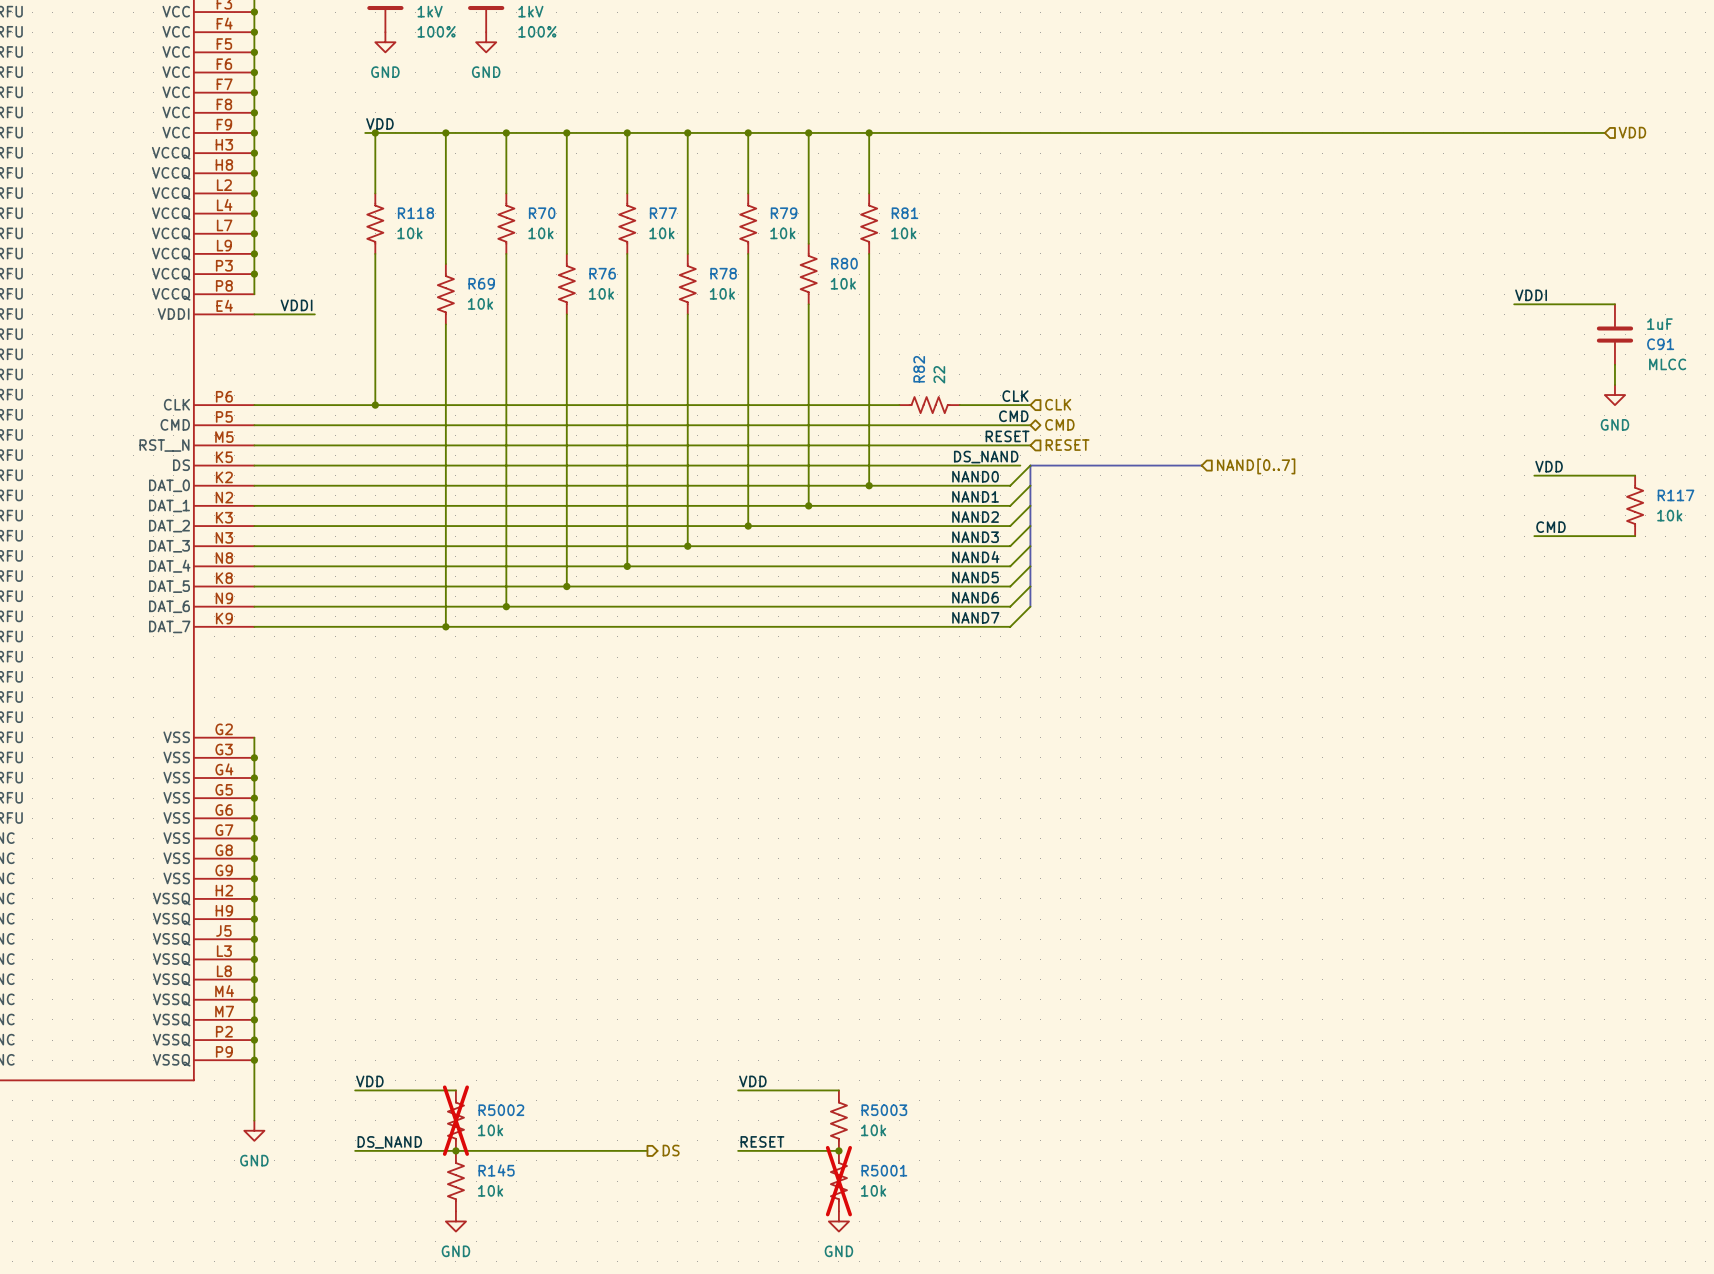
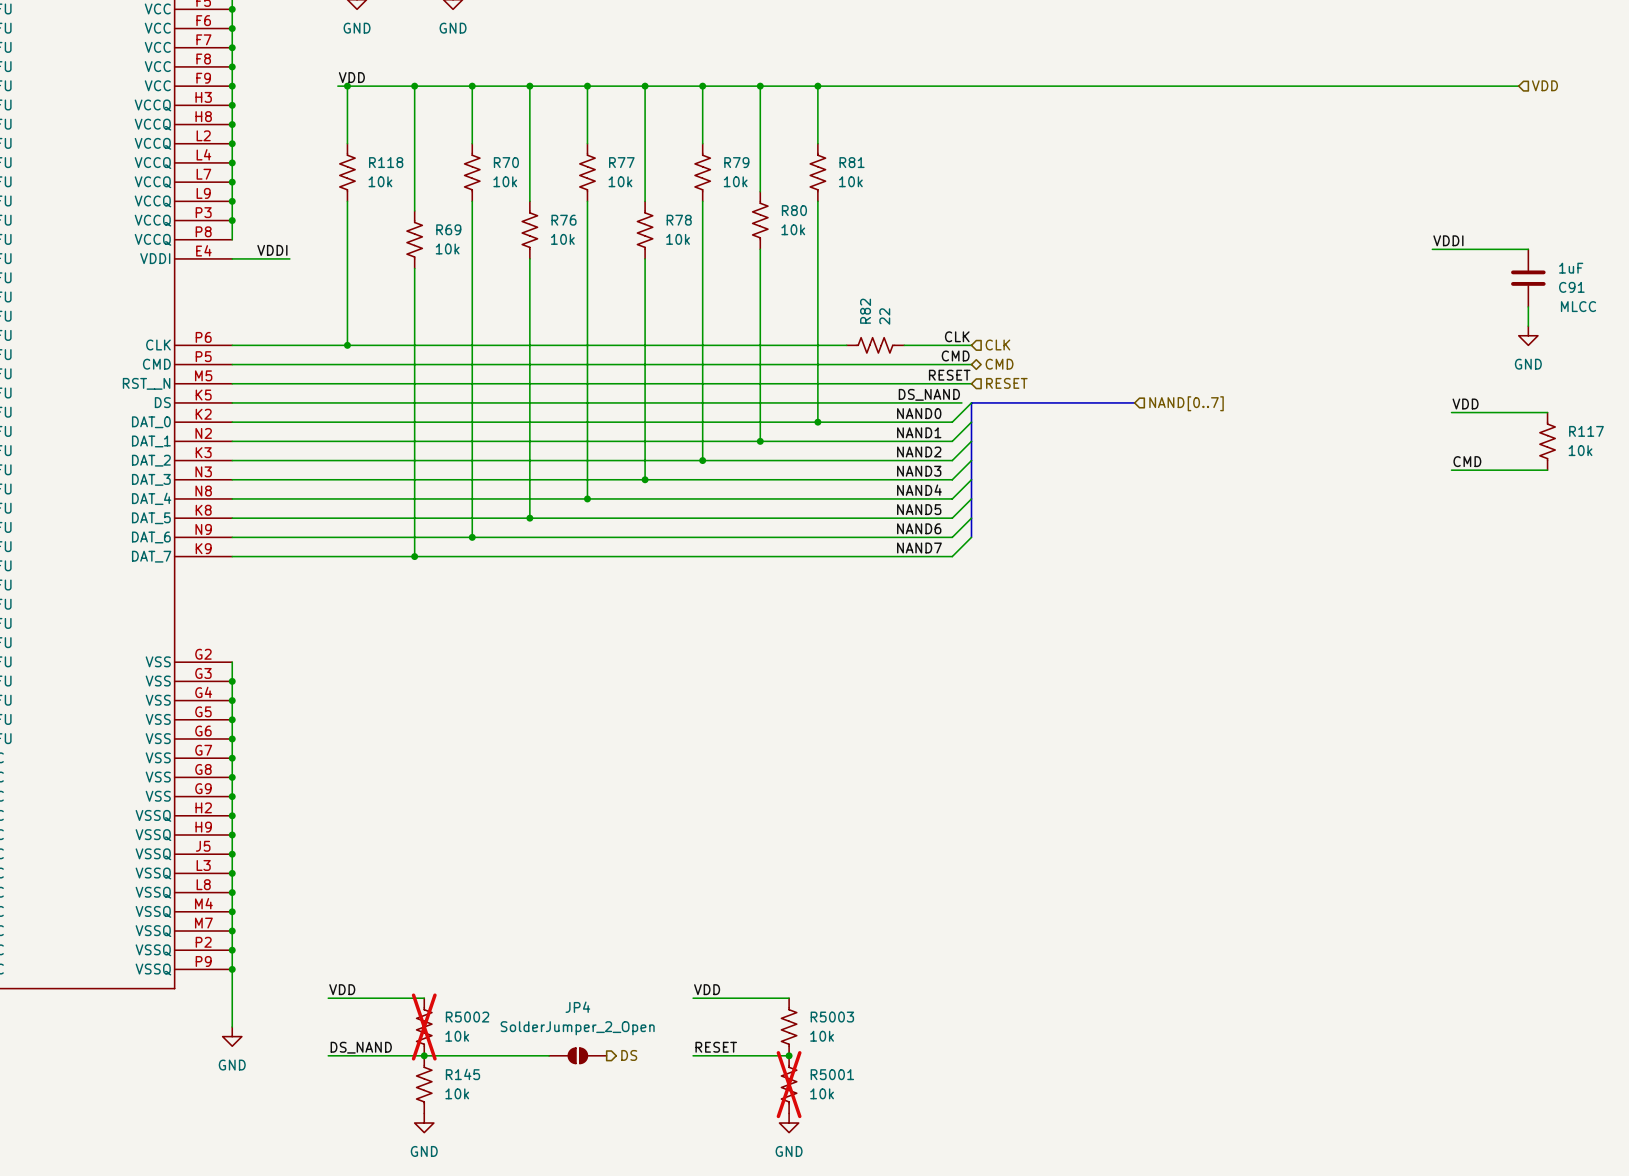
JP4: none -> SolderJumper_2_Open (577, 1055)

